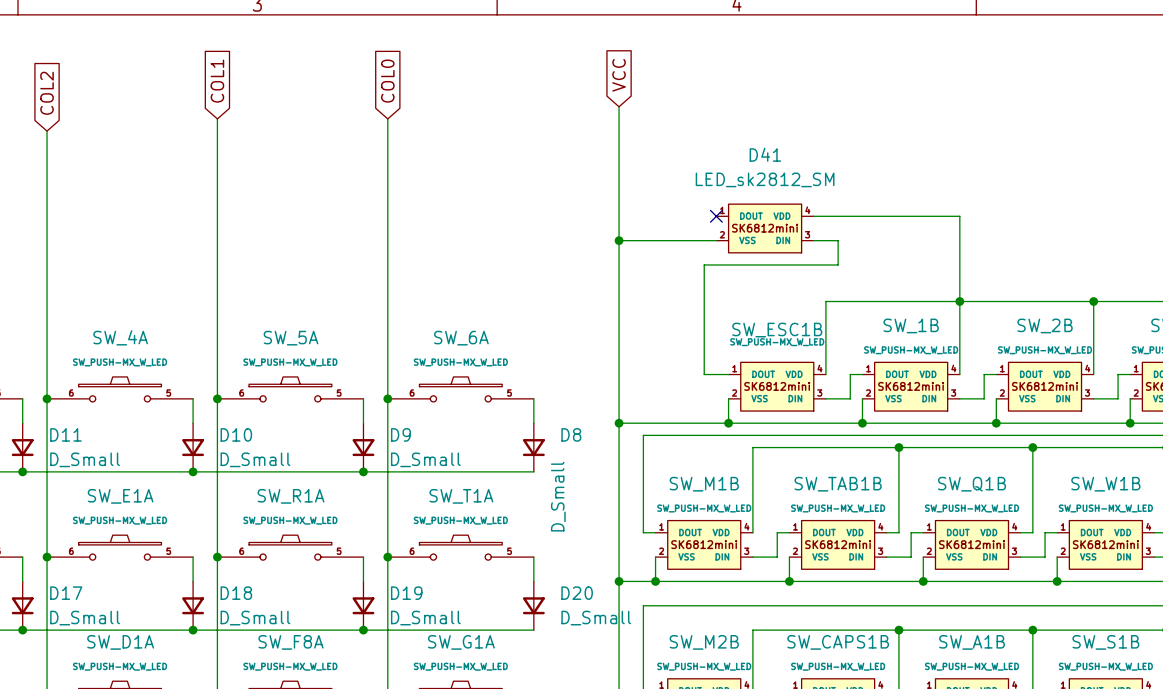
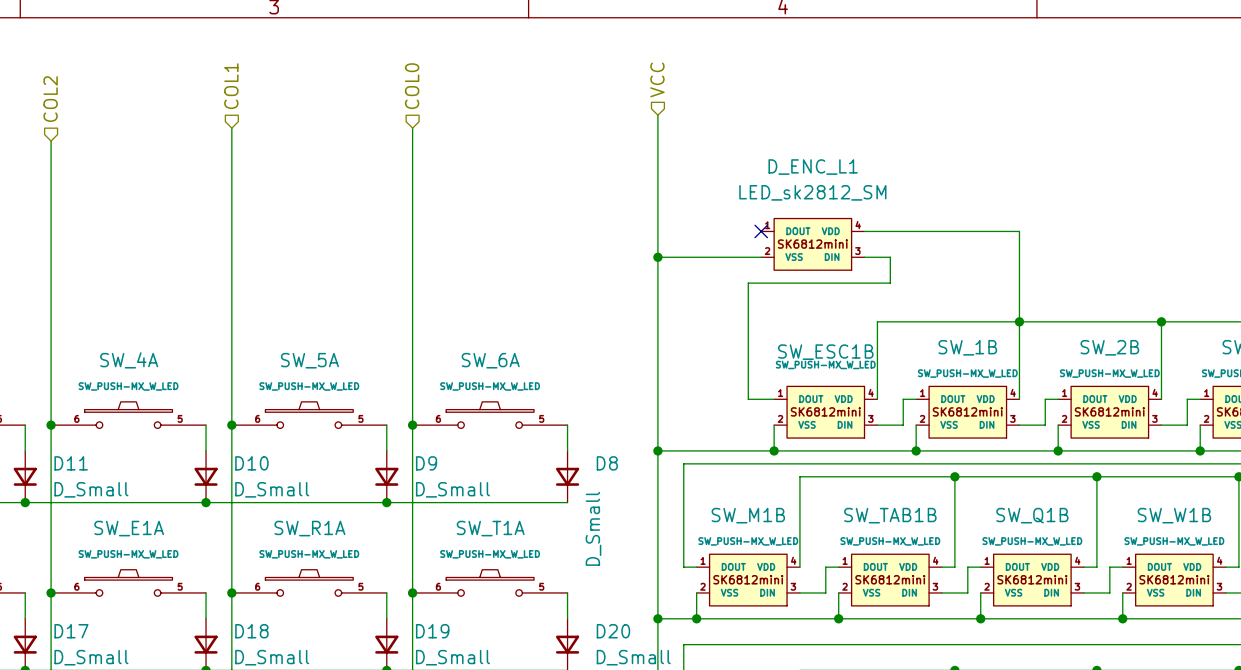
hierarchical label: none -> VCC (657, 80)
global label: VCC (619, 75) -> none
hierarchical label: none -> COL1 (231, 86)
hierarchical label: none -> COL0 (412, 86)
global label: COL1 (217, 81) -> none
global label: COL0 (387, 81) -> none
hierarchical label: none -> COL2 (50, 99)
global label: COL2 (47, 93) -> none
D41 name: D41 (765, 154) -> D_ENC_L1 (813, 167)

